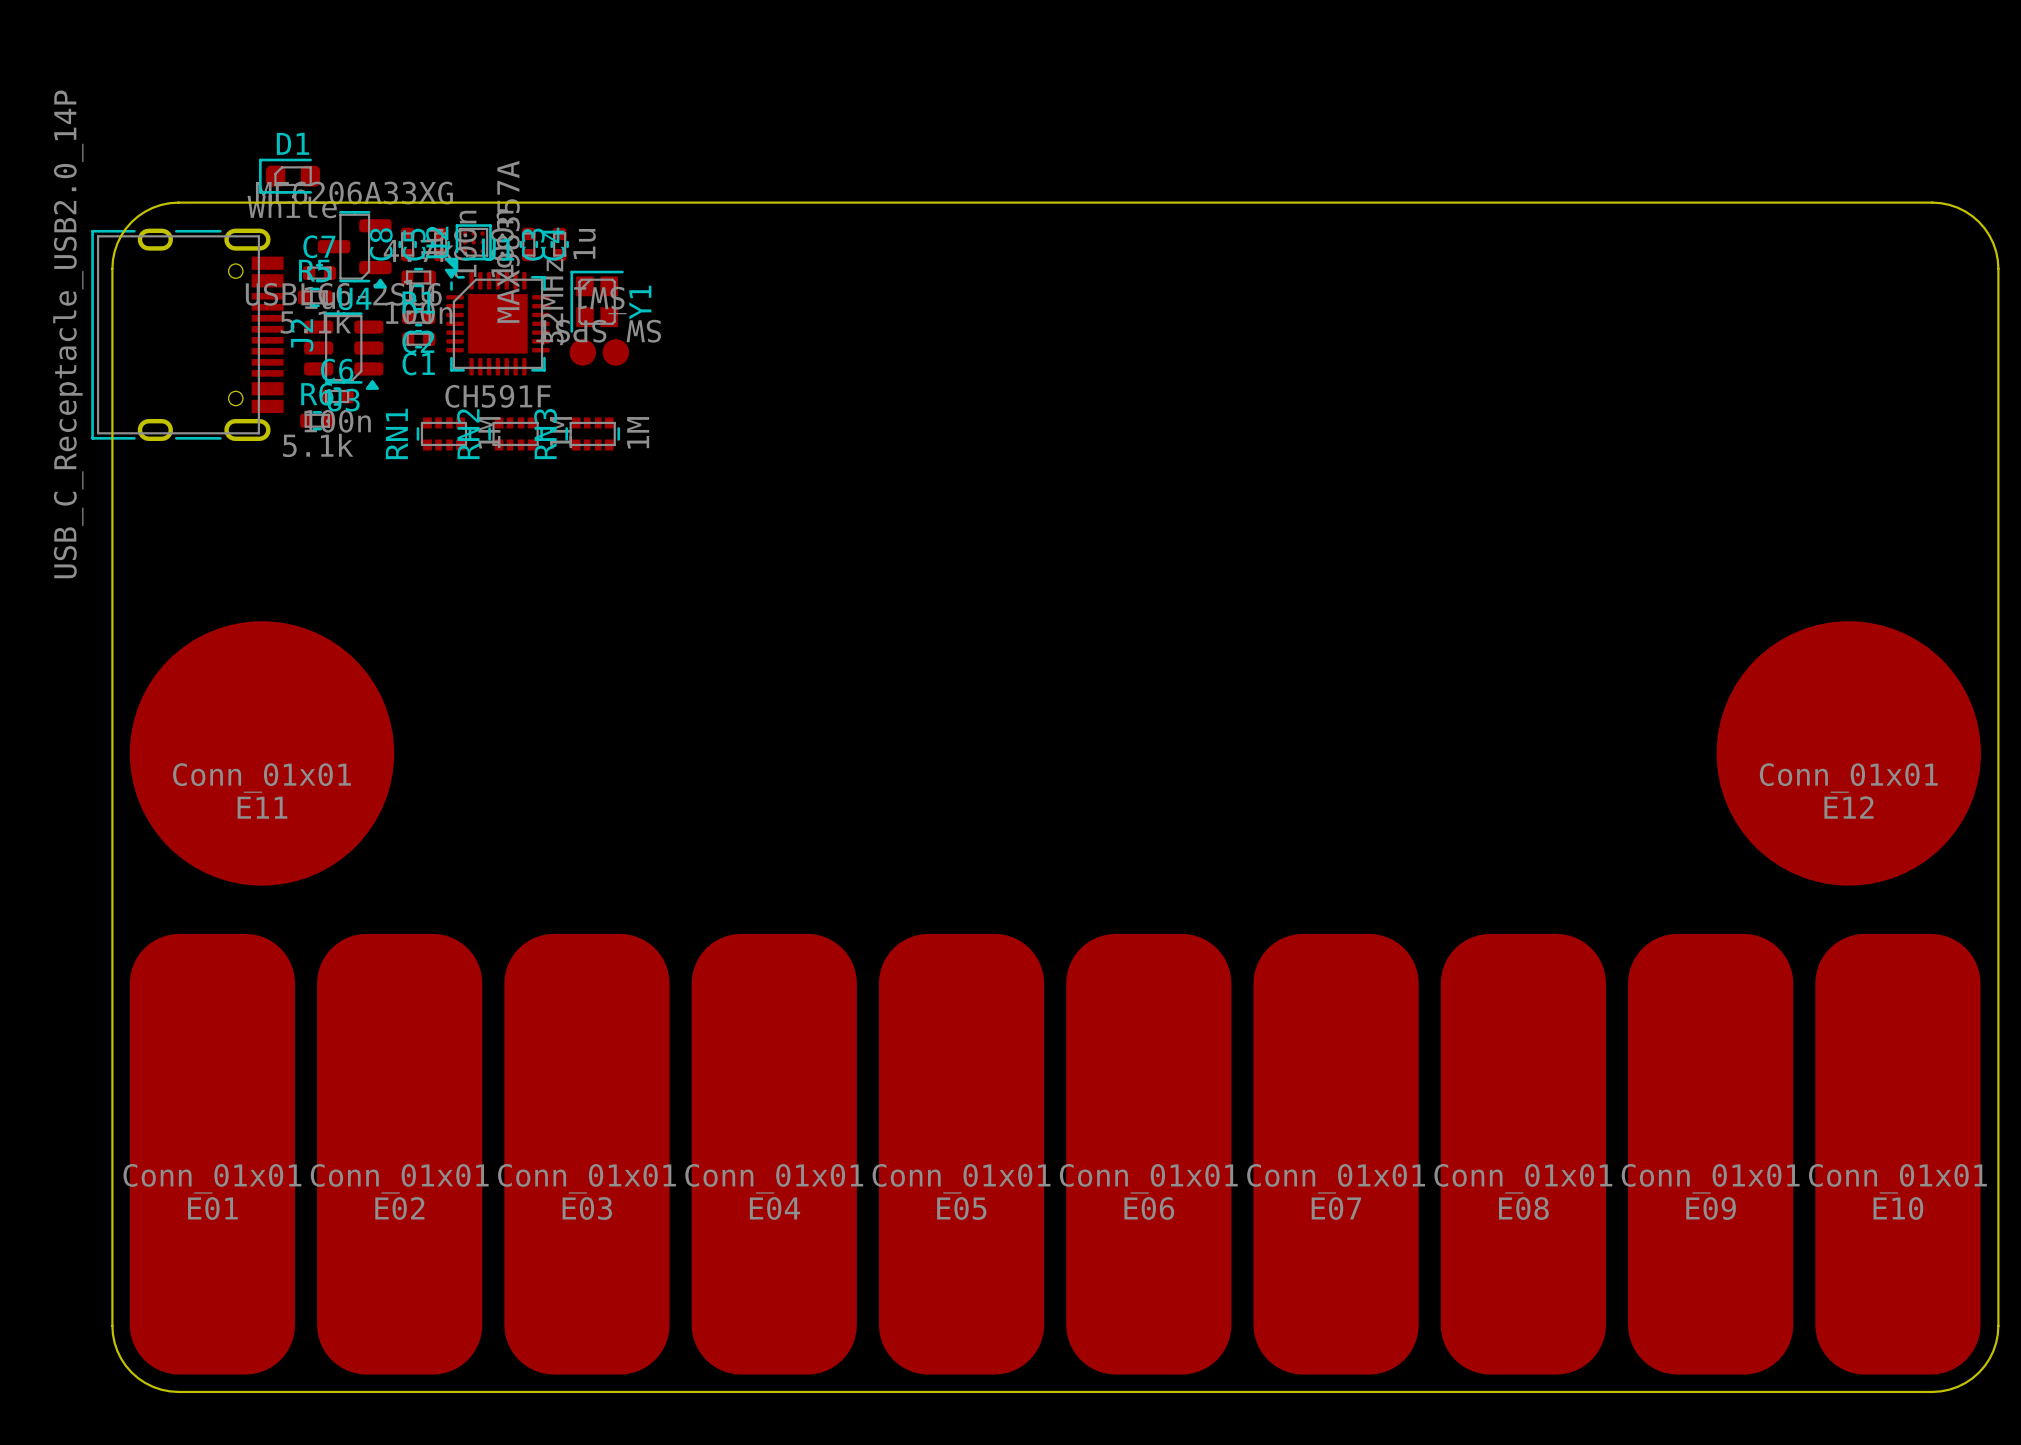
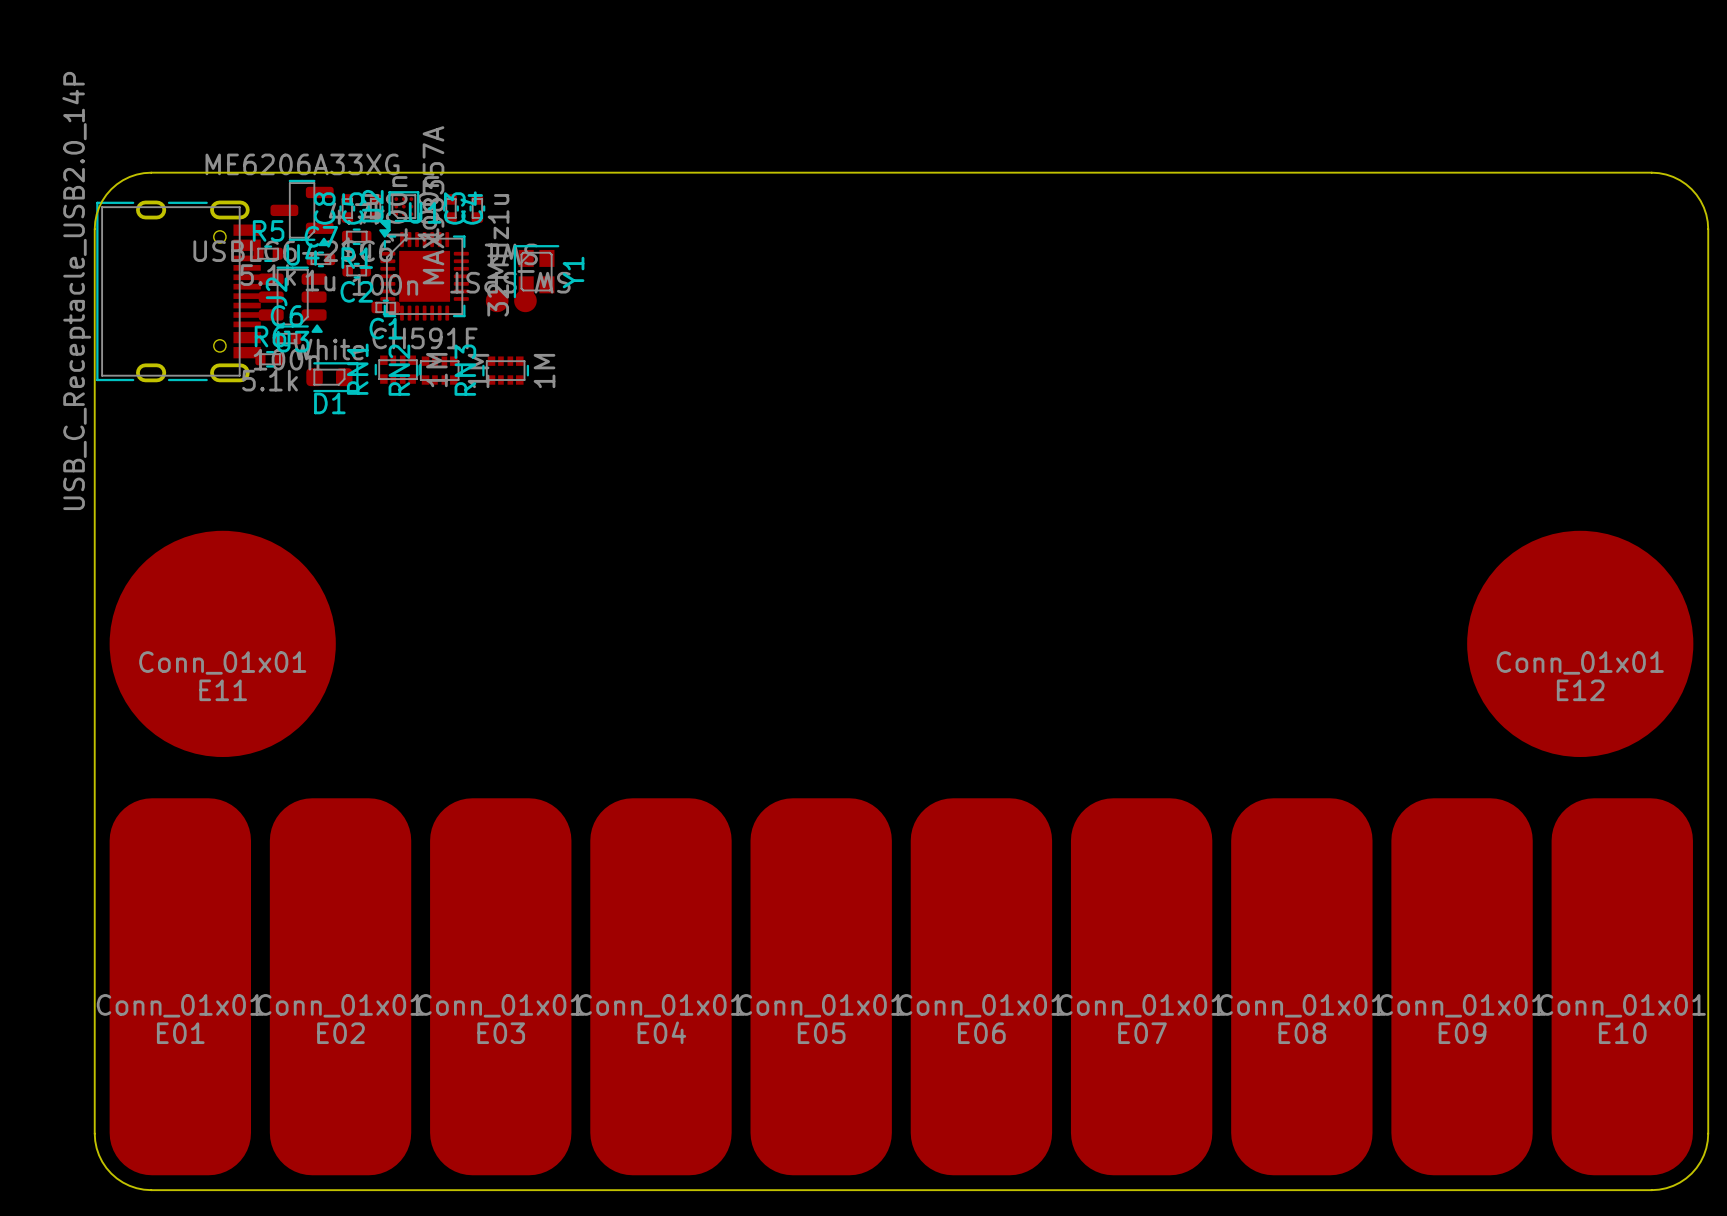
D1 rotation: 0° (289, 176) -> 180° (332, 377)
D1 position: (289, 176) -> (332, 377)
C7 position: (319, 273) -> (320, 259)
Y1 position: (597, 301) -> (536, 271)
J2 position: (187, 334) -> (178, 291)
C1 position: (418, 339) -> (385, 307)
RN1 position: (443, 433) -> (398, 369)

